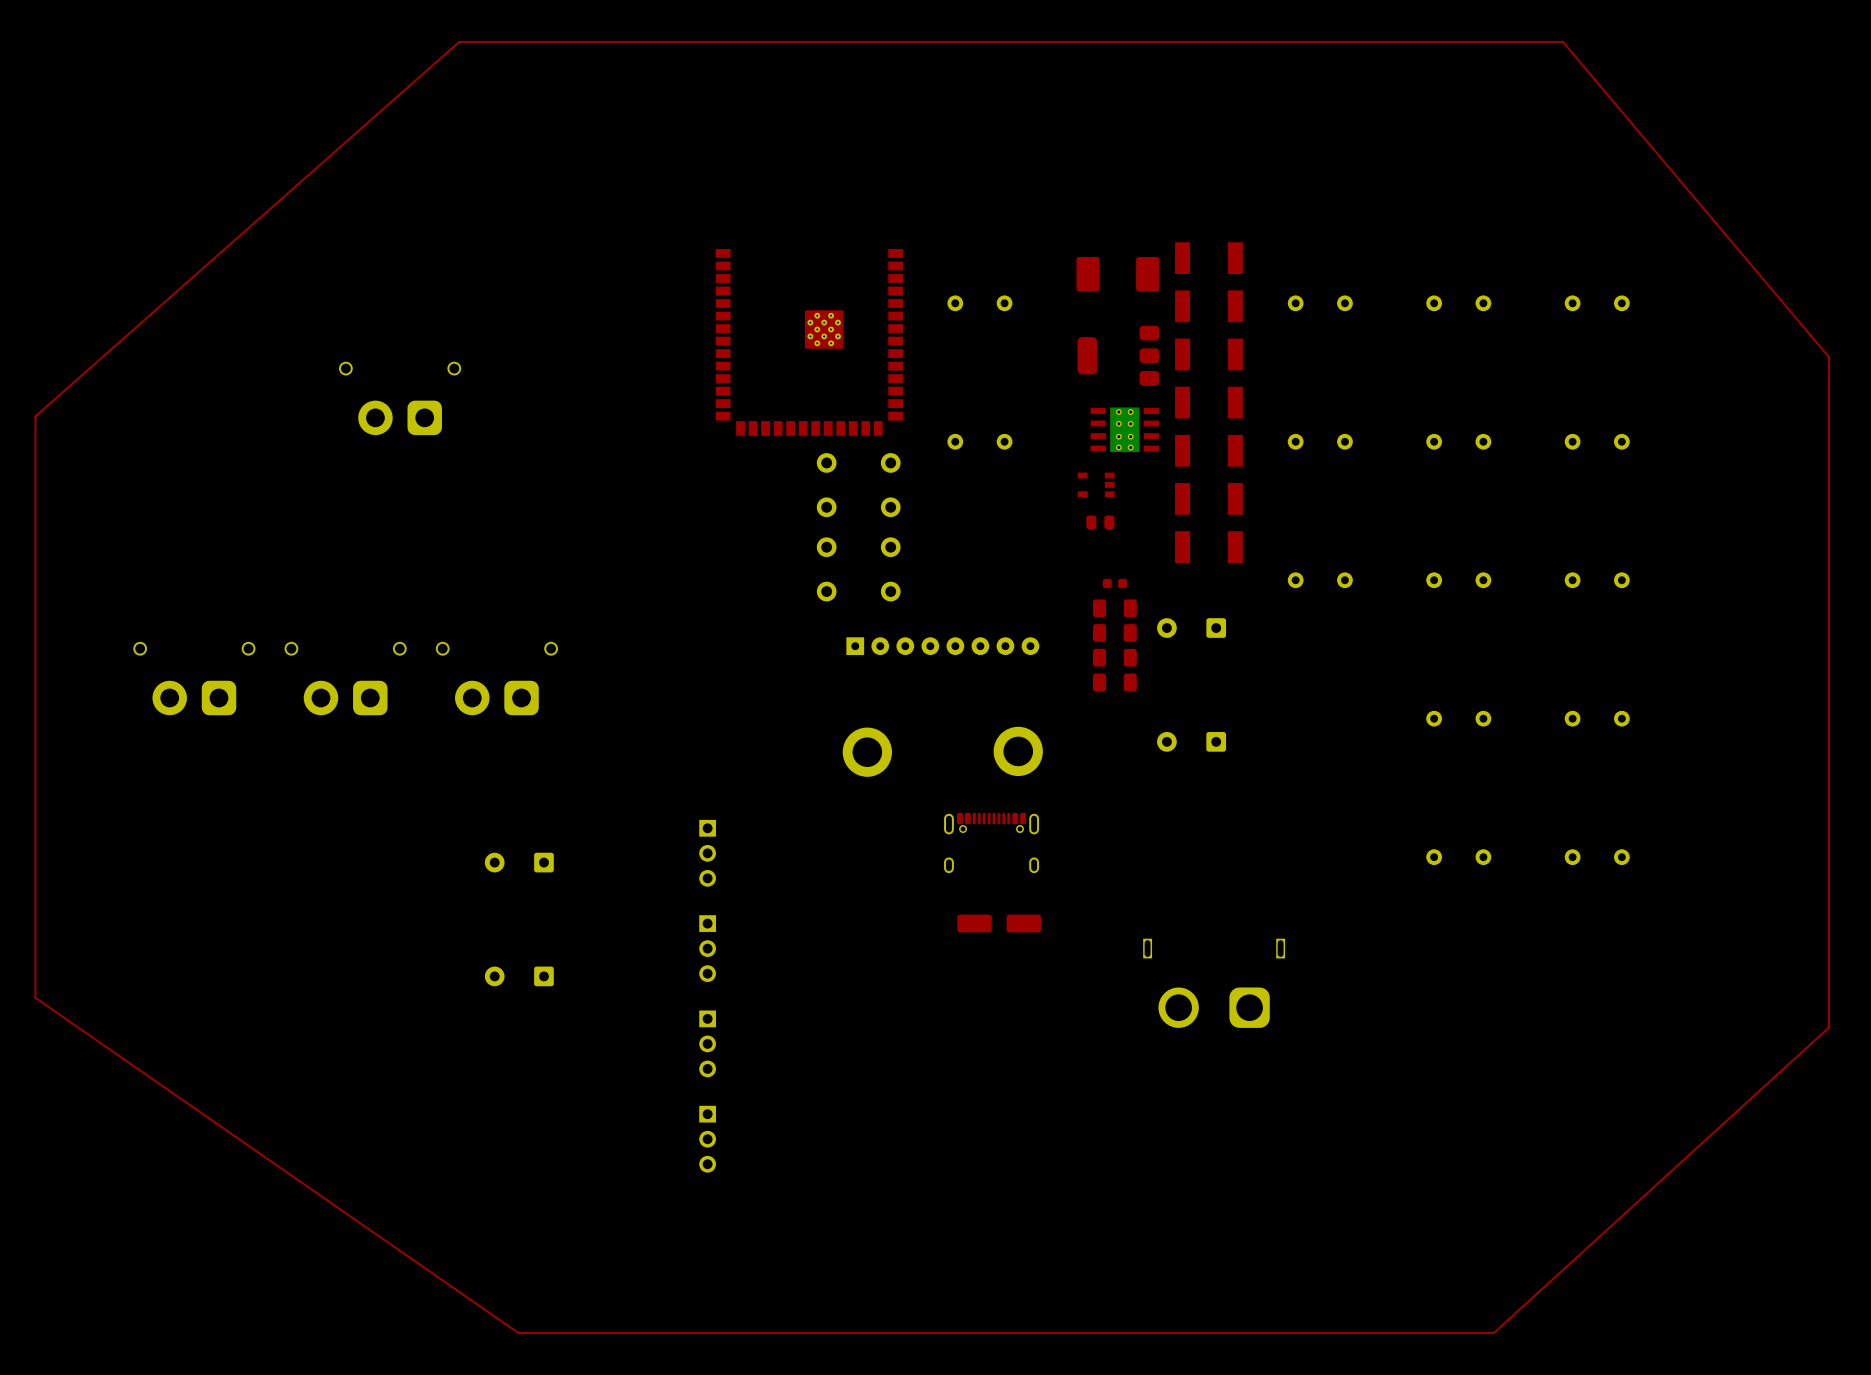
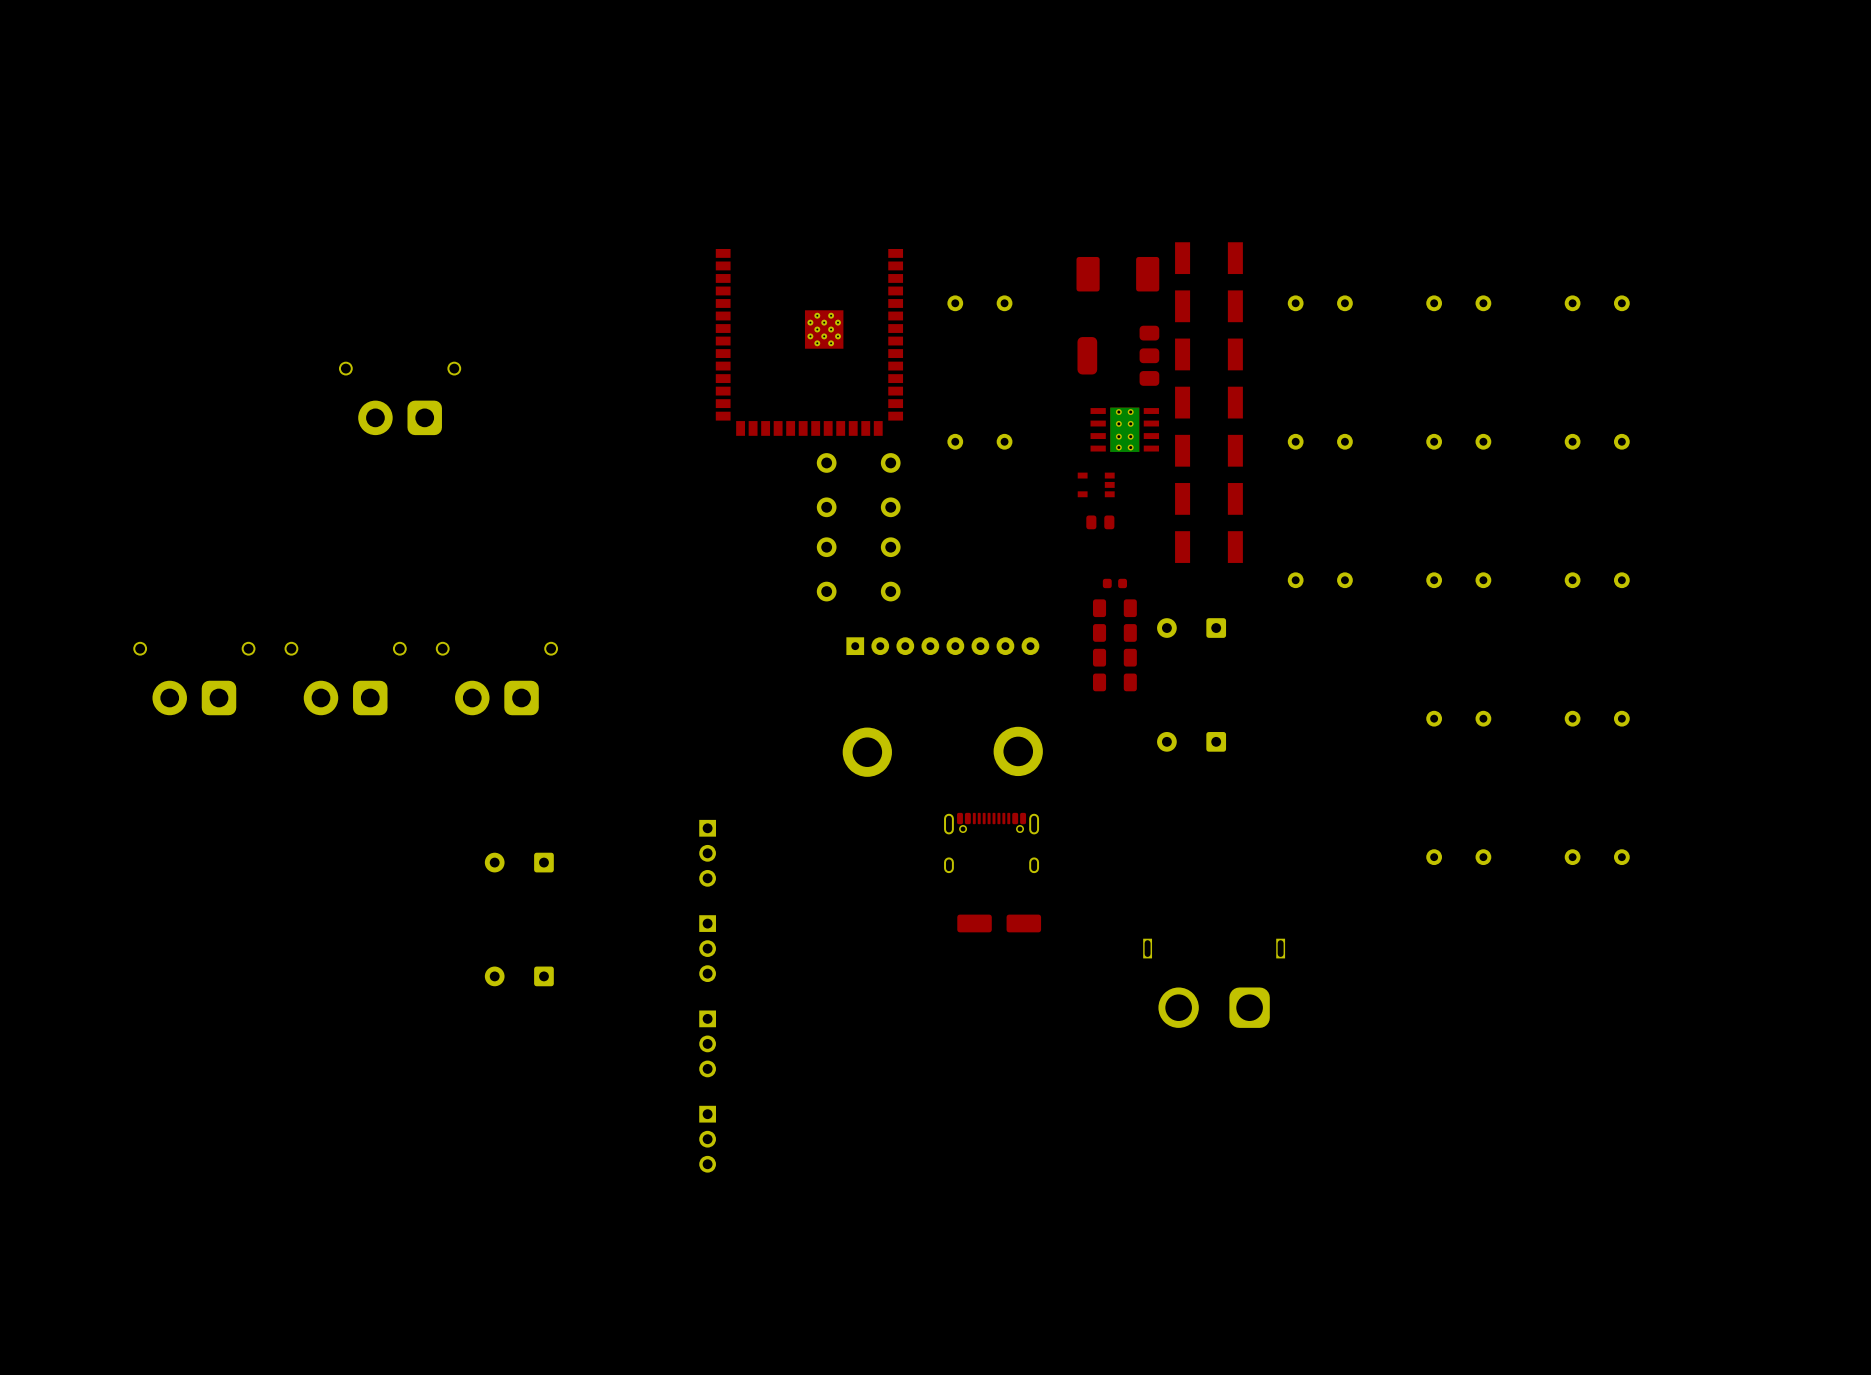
top track: (1562, 41) (1829, 357) (1829, 1027) (1494, 1332) (518, 1332) (35, 997) (35, 416) (459, 41) (1562, 41) -> none

